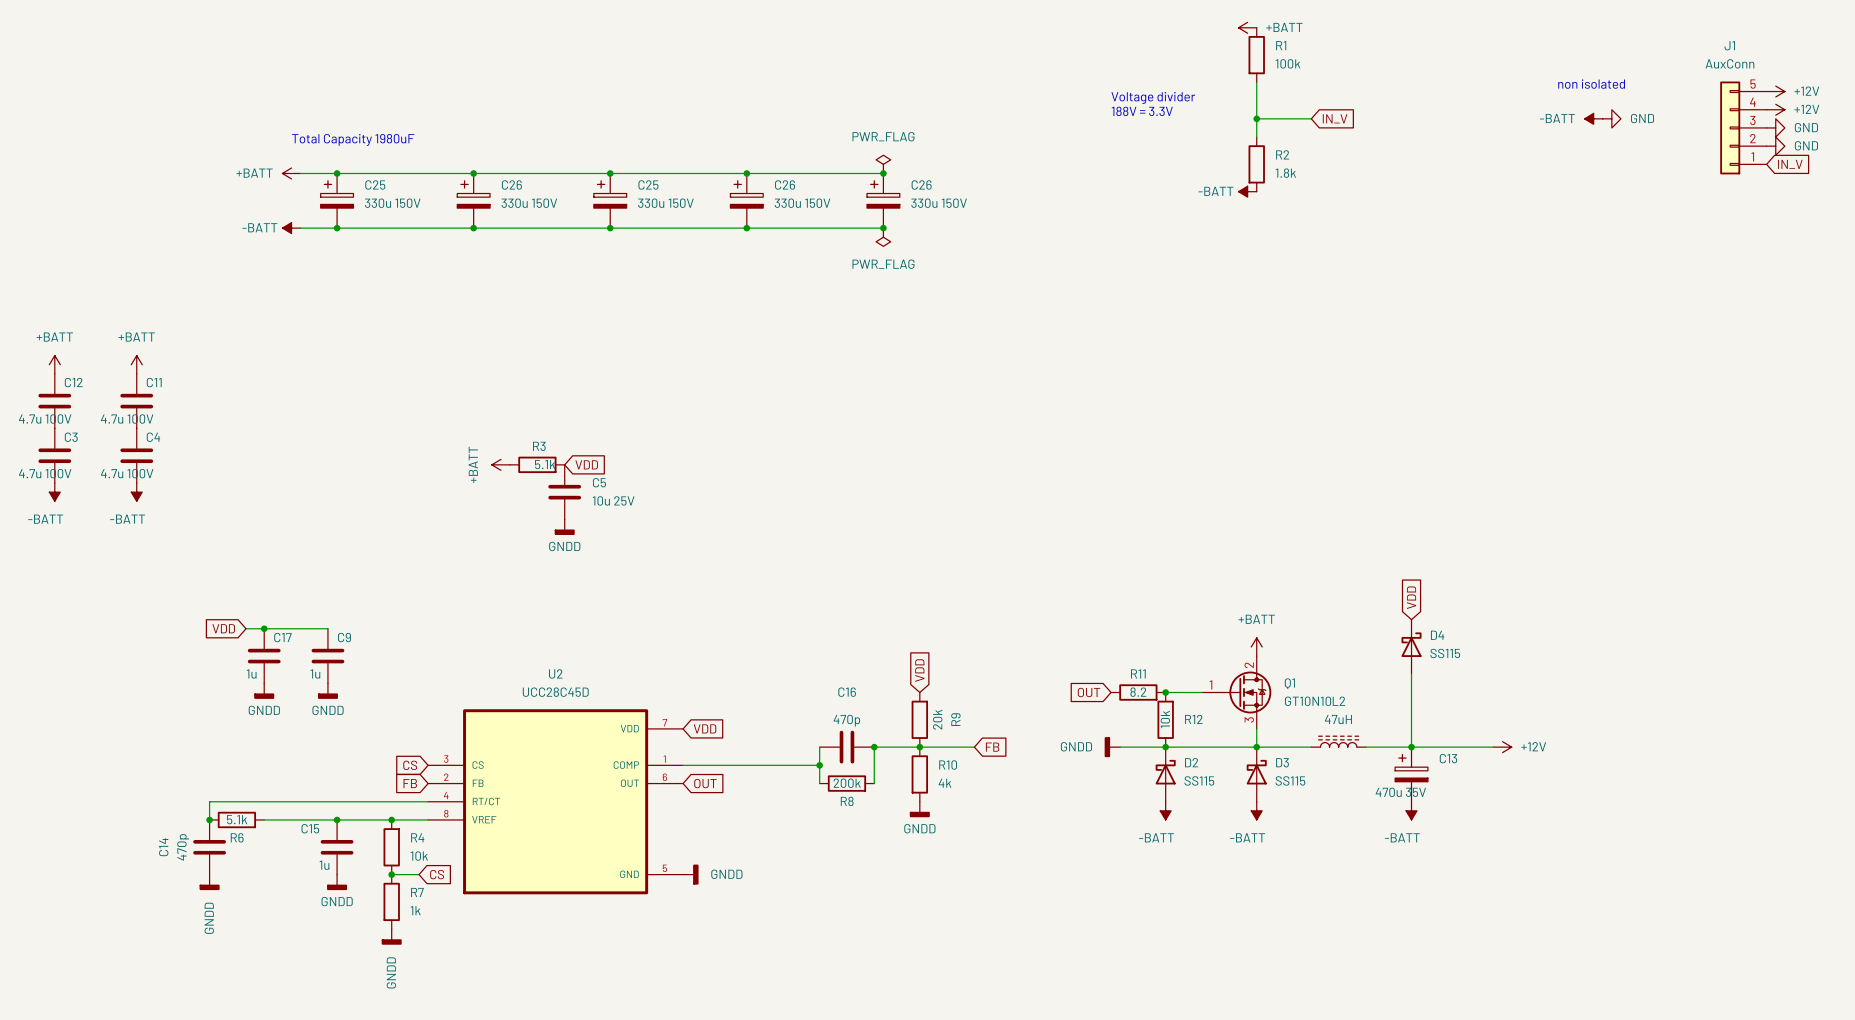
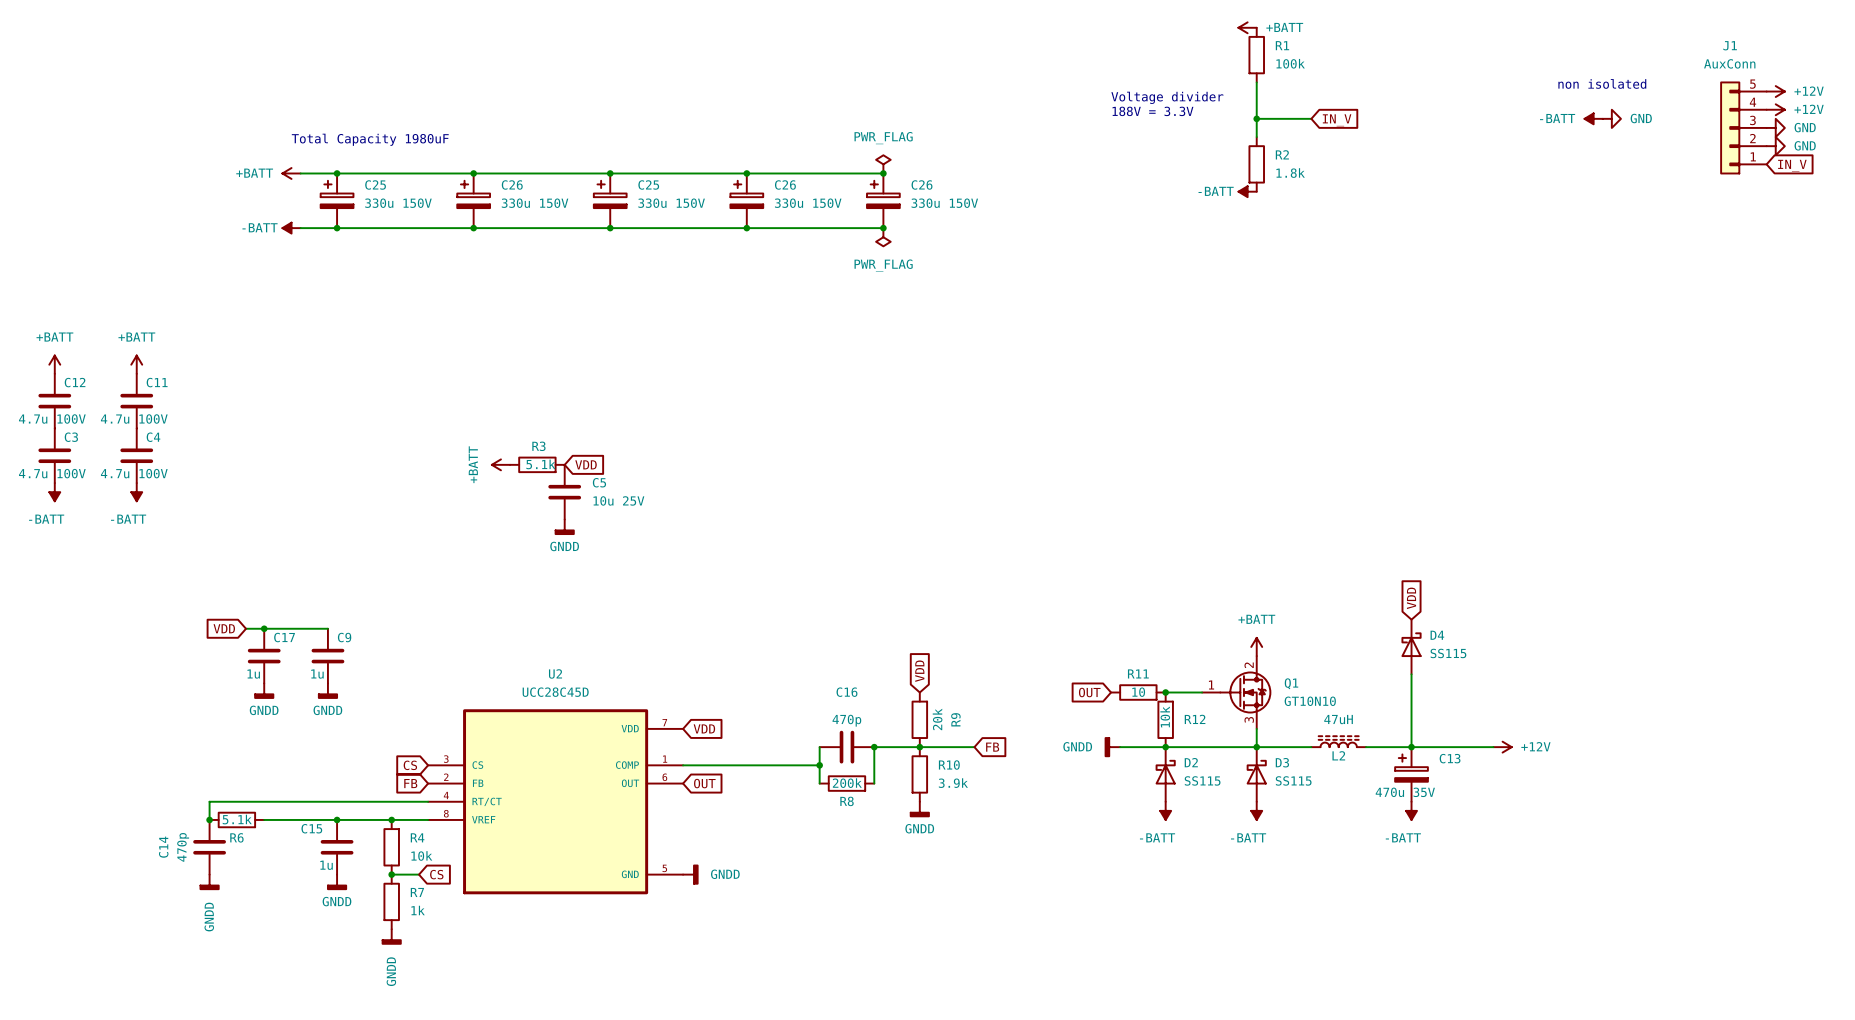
R11 value: 8.2 (1138, 692) -> 10 (1138, 692)
L2 name position: L2 (1338, 701) -> L2 (1338, 755)
R10 value: 4k (944, 783) -> 3.9k (953, 783)

